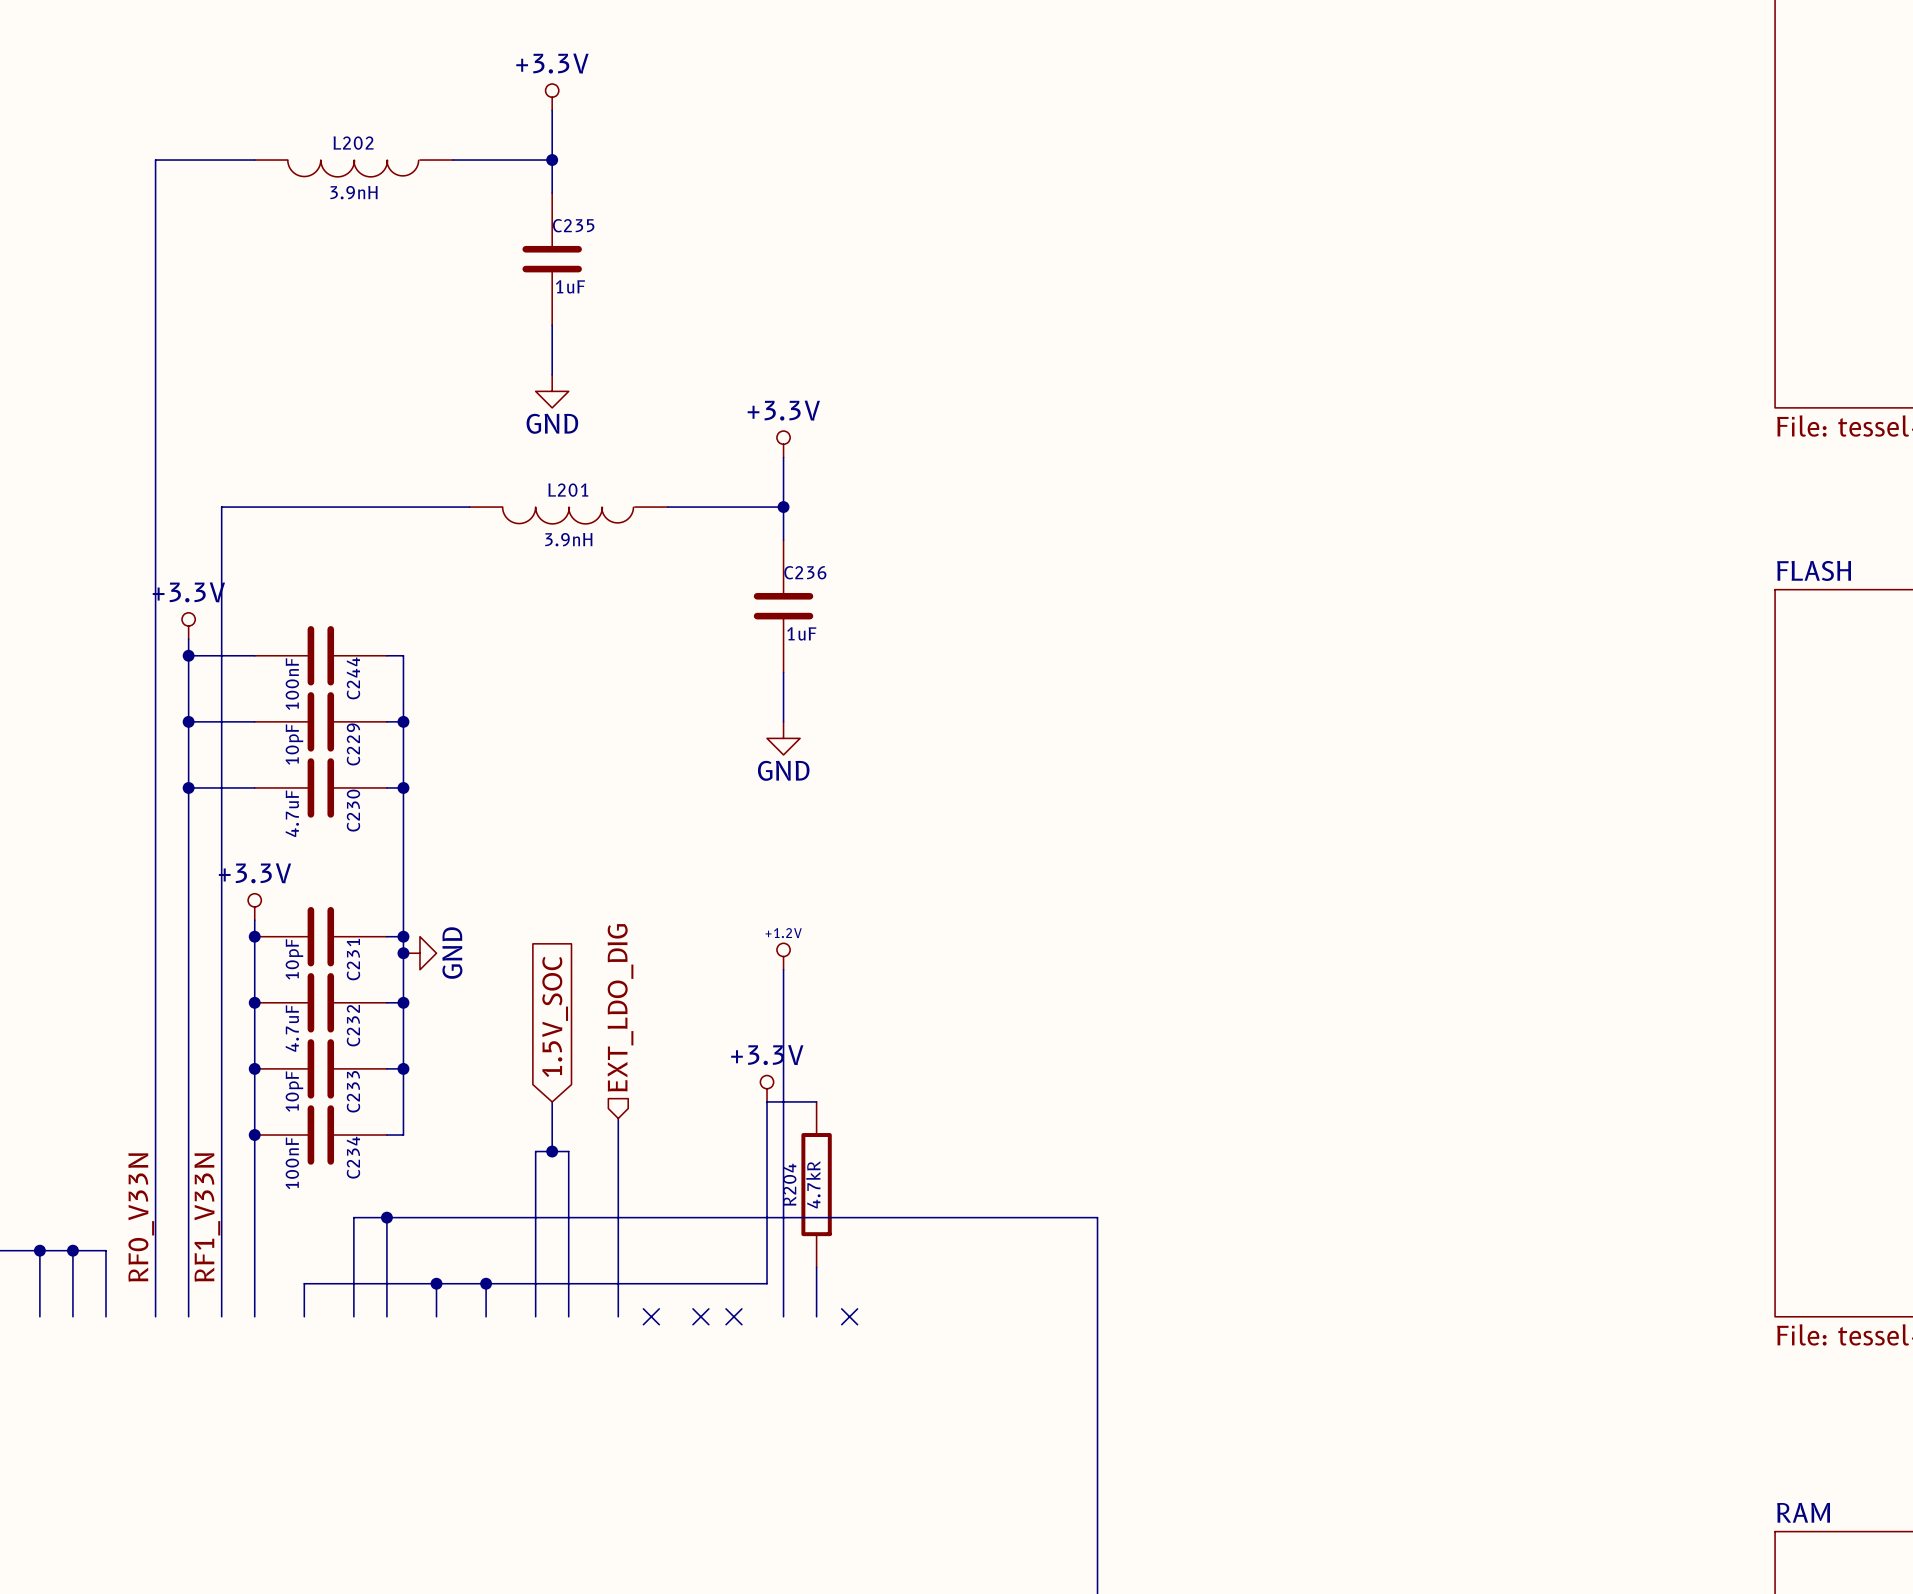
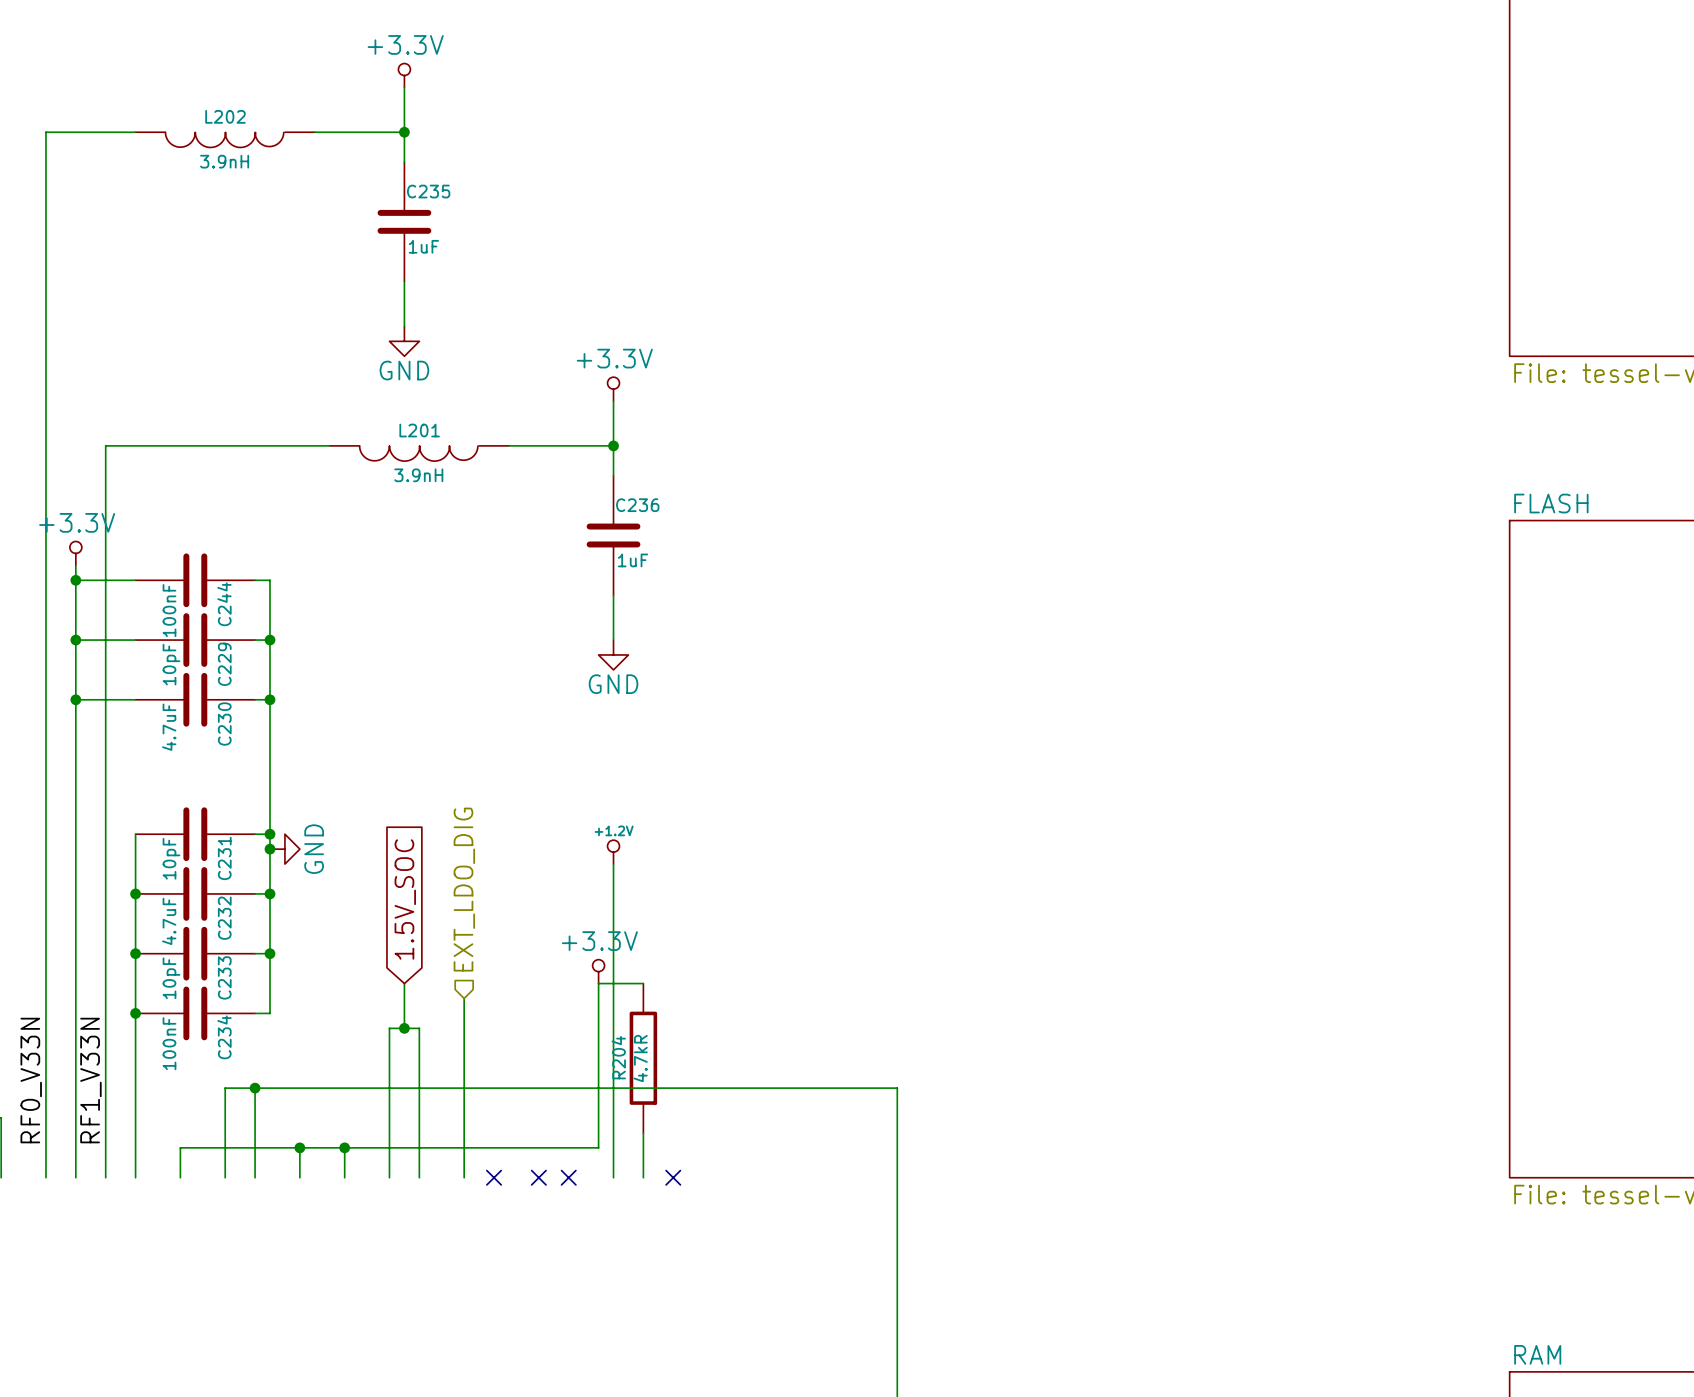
power symbol: +3.3V (254, 906) -> none
wire: (254, 920) (254, 936) -> none
junction: (254, 936) -> none

